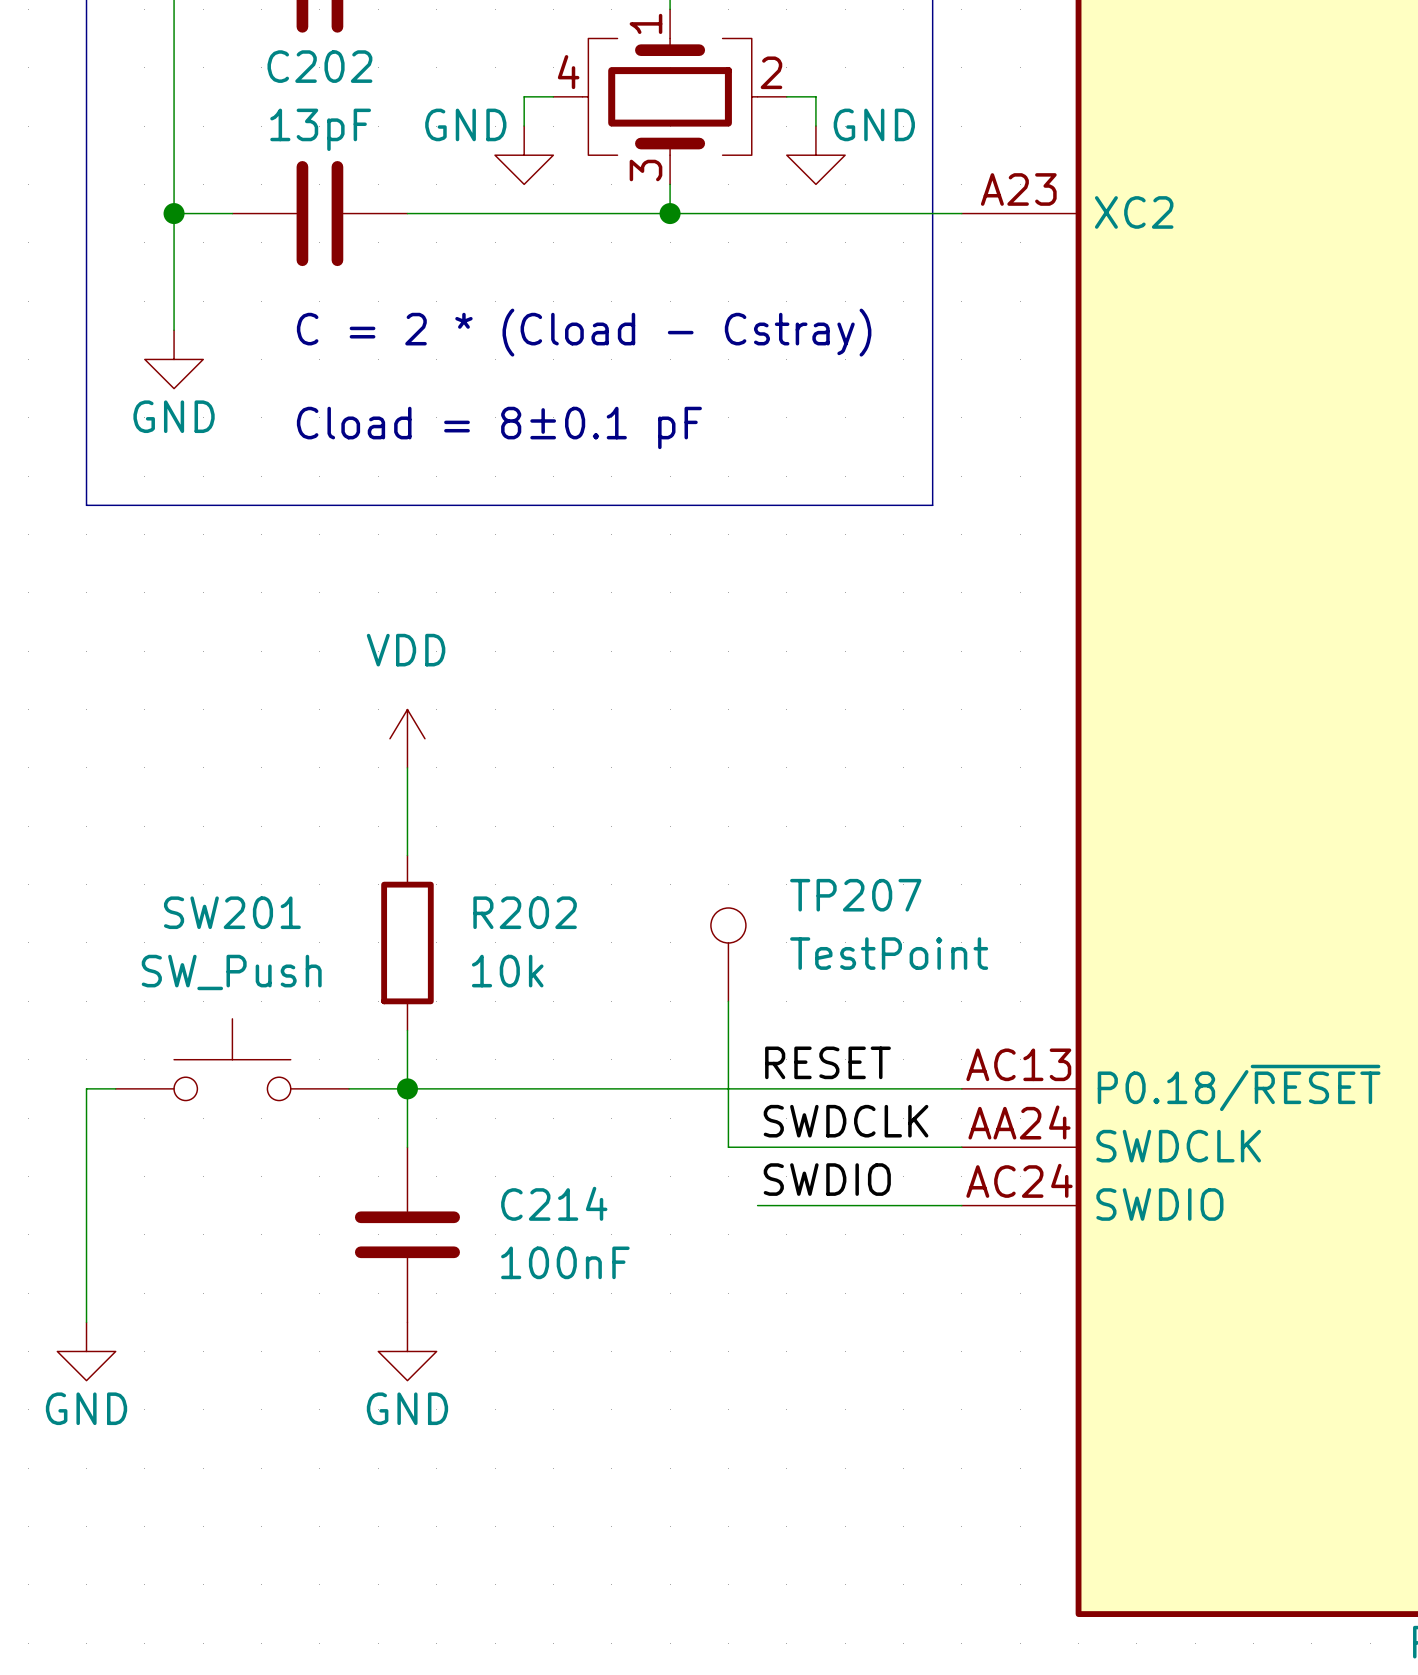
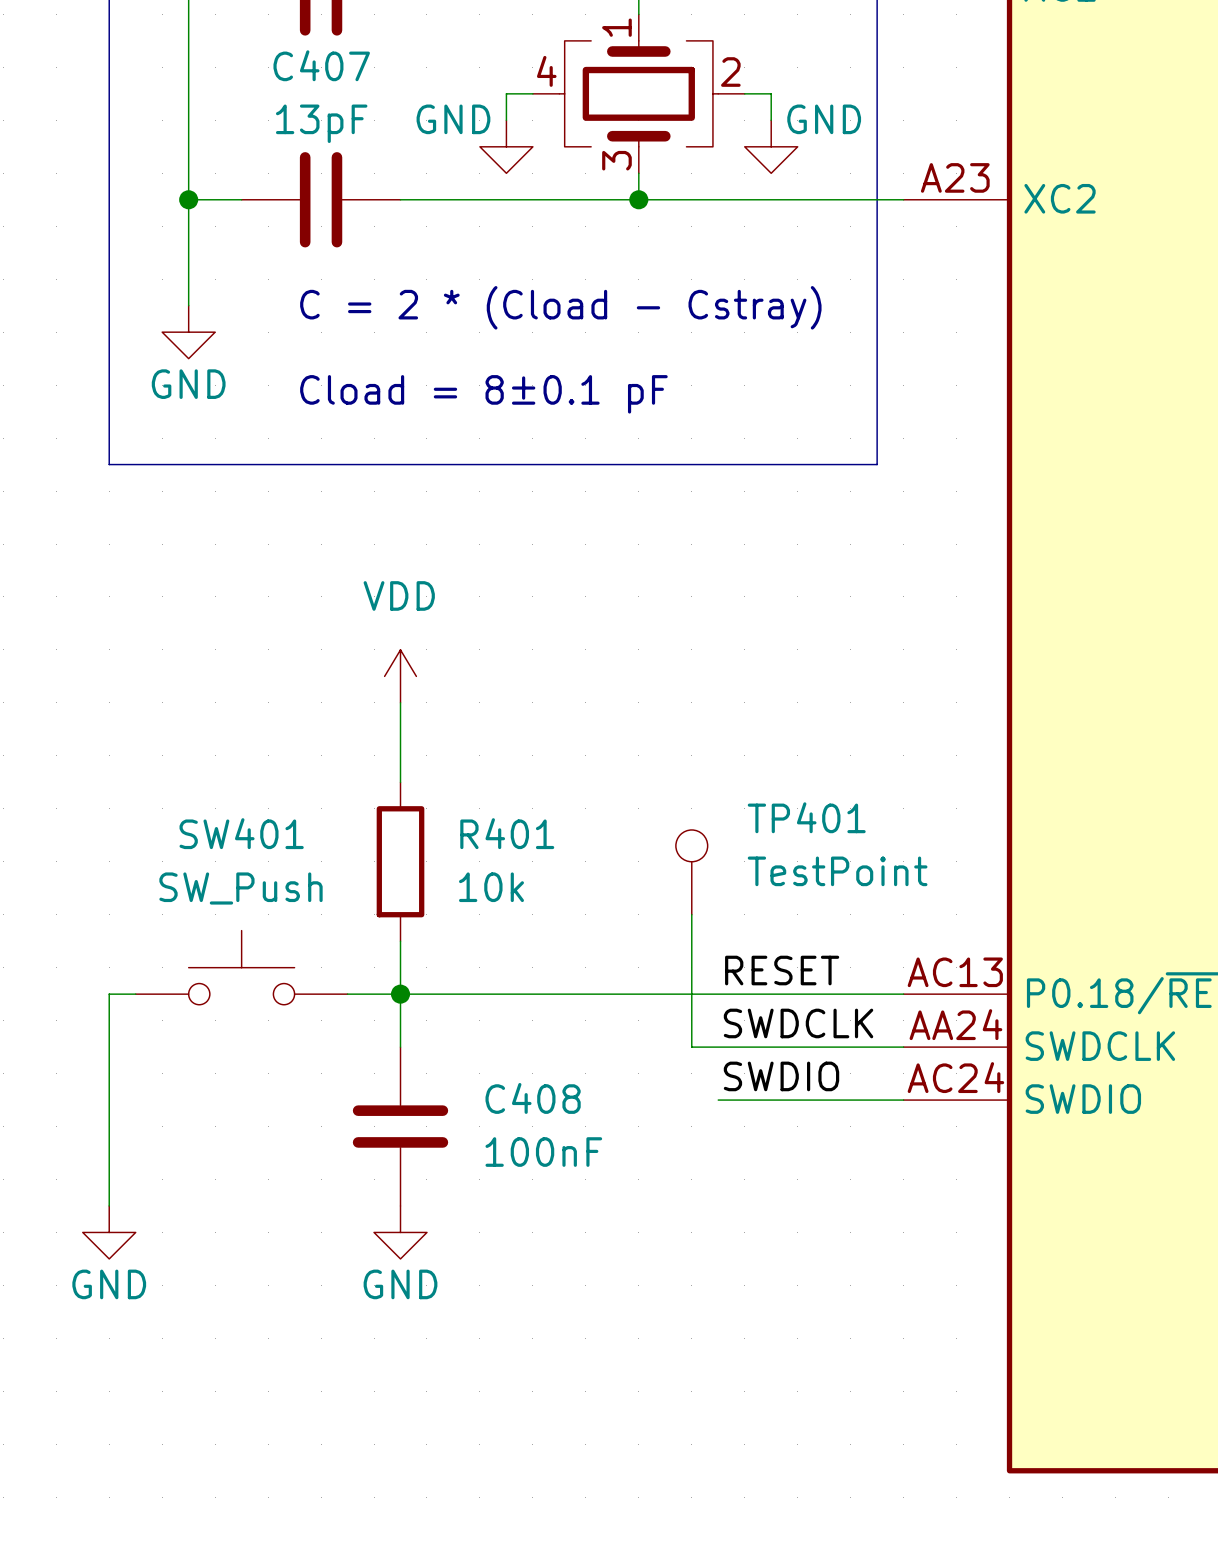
C202 name: C202 (319, 66) -> C407 (321, 65)
TP207 name: TP207 (855, 895) -> TP401 (806, 817)
SW201 name: SW201 (232, 912) -> SW401 (241, 833)
R202 name: R202 (525, 912) -> R401 (507, 833)
C214 name: C214 (554, 1203) -> C408 (533, 1098)

